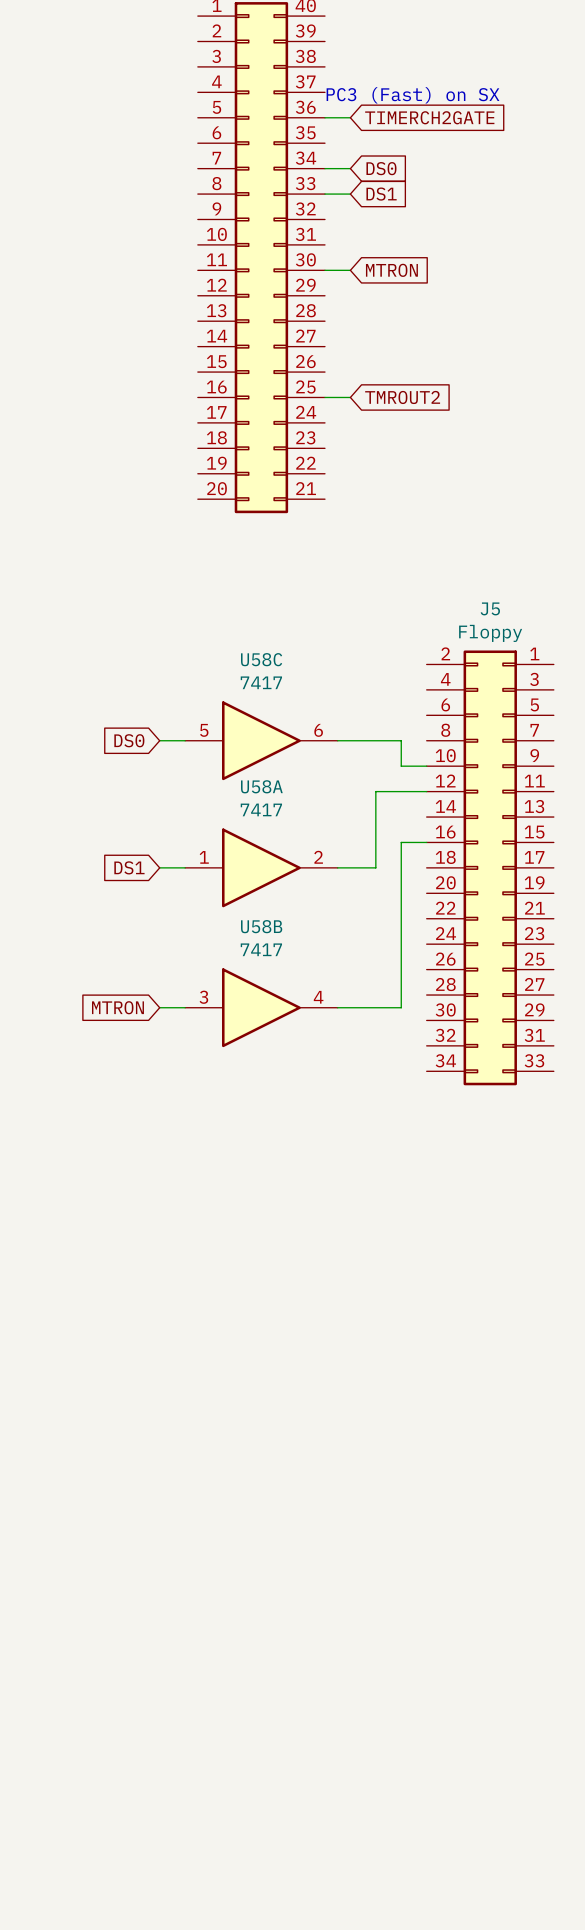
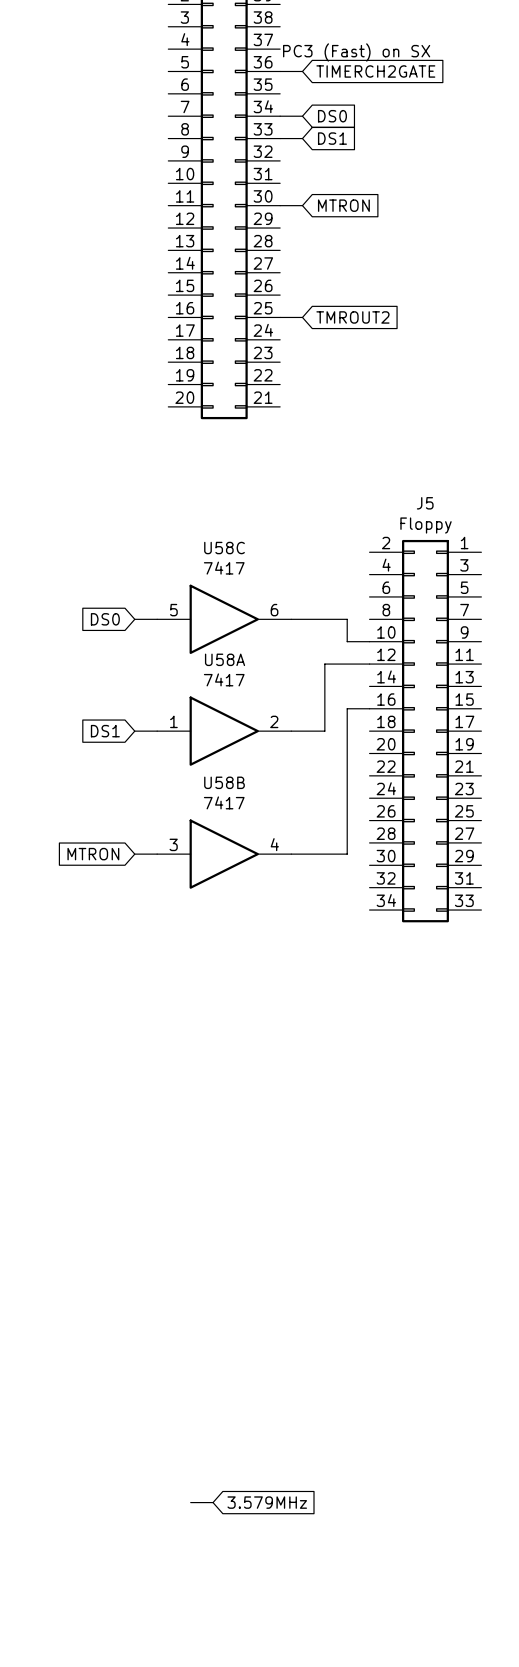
wire: none -> (190, 1502) (213, 1502)
global label: none -> 3.579MHz (267, 1502)

